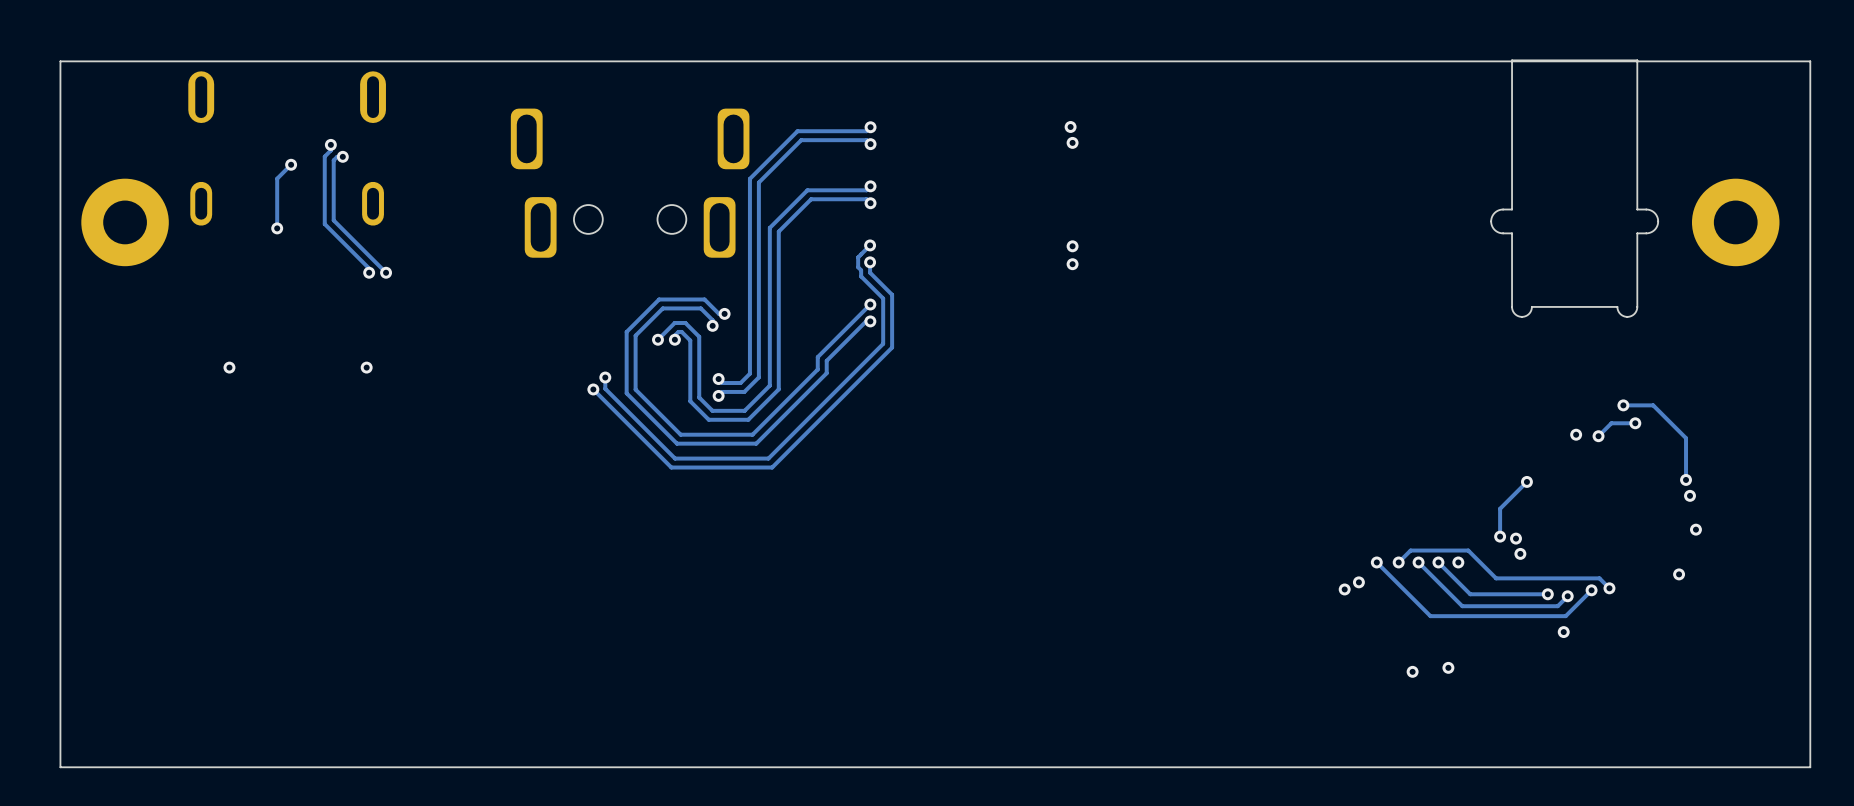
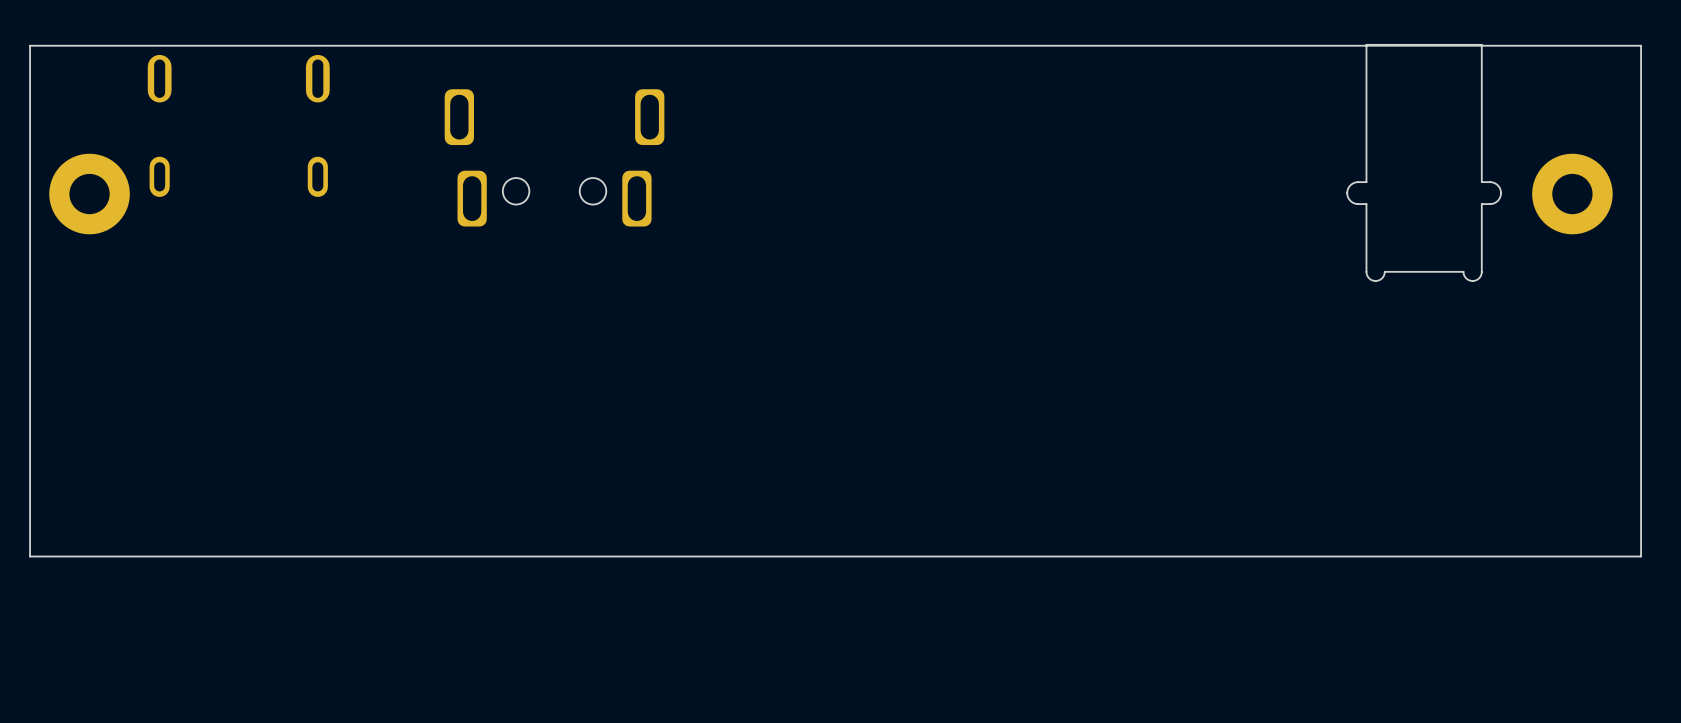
via: (1070, 126) -> none
track: (870, 127) (866, 131) (797, 131) (749, 178) (749, 373) (740, 383) (722, 383) (718, 379) -> none
via: (870, 127) -> none
via: (1072, 142) -> none
track: (330, 144) (330, 150) (324, 156) (324, 224) (369, 268) (369, 272) -> none
via: (330, 144) -> none
track: (870, 144) (866, 140) (801, 140) (758, 182) (758, 377) (744, 391) (722, 391) (718, 395) -> none
via: (870, 144) -> none
track: (342, 156) (337, 156) (333, 160) (333, 220) (386, 272) -> none
via: (342, 156) -> none
track: (291, 164) (277, 178) (277, 228) -> none
via: (291, 164) -> none
track: (870, 186) (866, 190) (807, 190) (769, 227) (769, 385) (744, 410) (712, 410) (699, 397) (699, 336) (685, 322) (674, 322) (657, 339) -> none
via: (870, 186) -> none
track: (870, 203) (866, 199) (811, 199) (778, 231) (778, 389) (748, 419) (708, 419) (690, 401) (690, 340) (681, 331) (678, 331) (674, 335) (674, 339) -> none
via: (870, 203) -> none
via: (277, 228) -> none
track: (870, 245) (858, 257) (858, 267) (861, 270) (861, 276) (883, 298) (883, 343) (768, 458) (675, 458) (605, 388) (605, 377) -> none
via: (870, 245) -> none
via: (1072, 246) -> none
track: (870, 262) (870, 272) (892, 294) (892, 347) (772, 467) (671, 467) (593, 389) -> none
via: (870, 262) -> none
via: (1072, 264) -> none
via: (369, 272) -> none
via: (386, 272) -> none
track: (870, 304) (817, 357) (817, 369) (752, 434) (680, 434) (635, 389) (635, 335) (662, 308) (700, 308) (712, 320) (712, 325) -> none
via: (870, 304) -> none
track: (724, 313) (718, 313) (704, 299) (659, 299) (626, 331) (626, 393) (677, 443) (756, 443) (826, 373) (826, 360) (866, 321) (870, 321) -> none
via: (724, 313) -> none
via: (870, 321) -> none
via: (712, 325) -> none
via: (657, 339) -> none
via: (674, 339) -> none
via: (229, 367) -> none
via: (366, 367) -> none
via: (605, 377) -> none
via: (718, 379) -> none
via: (593, 389) -> none
via: (718, 395) -> none
track: (1623, 405) (1653, 405) (1686, 438) (1686, 479) -> none
via: (1623, 405) -> none
track: (1635, 423) (1611, 423) (1598, 436) -> none
via: (1635, 423) -> none
via: (1576, 434) -> none
via: (1598, 436) -> none
via: (1686, 479) -> none
track: (1526, 481) (1500, 508) (1500, 536) -> none
via: (1526, 481) -> none
via: (1690, 495) -> none
via: (1695, 529) -> none
via: (1500, 536) -> none
via: (1516, 538) -> none
via: (1520, 553) -> none
track: (1376, 562) (1430, 616) (1565, 616) (1591, 590) -> none
via: (1376, 562) -> none
track: (1398, 562) (1410, 550) (1468, 550) (1496, 578) (1599, 578) (1609, 588) -> none
via: (1398, 562) -> none
track: (1418, 562) (1462, 606) (1557, 606) (1567, 596) -> none
via: (1418, 562) -> none
track: (1438, 562) (1470, 594) (1547, 594) -> none
via: (1438, 562) -> none
via: (1458, 562) -> none
via: (1679, 574) -> none
via: (1358, 582) -> none
via: (1609, 588) -> none
via: (1344, 589) -> none
via: (1591, 590) -> none
via: (1547, 594) -> none
via: (1567, 596) -> none
board edge: (1810, 616) (1810, 767) (60, 767) (60, 616) -> (1641, 556) (30, 556)
via: (1563, 632) -> none
via: (1448, 667) -> none
via: (1412, 671) -> none

